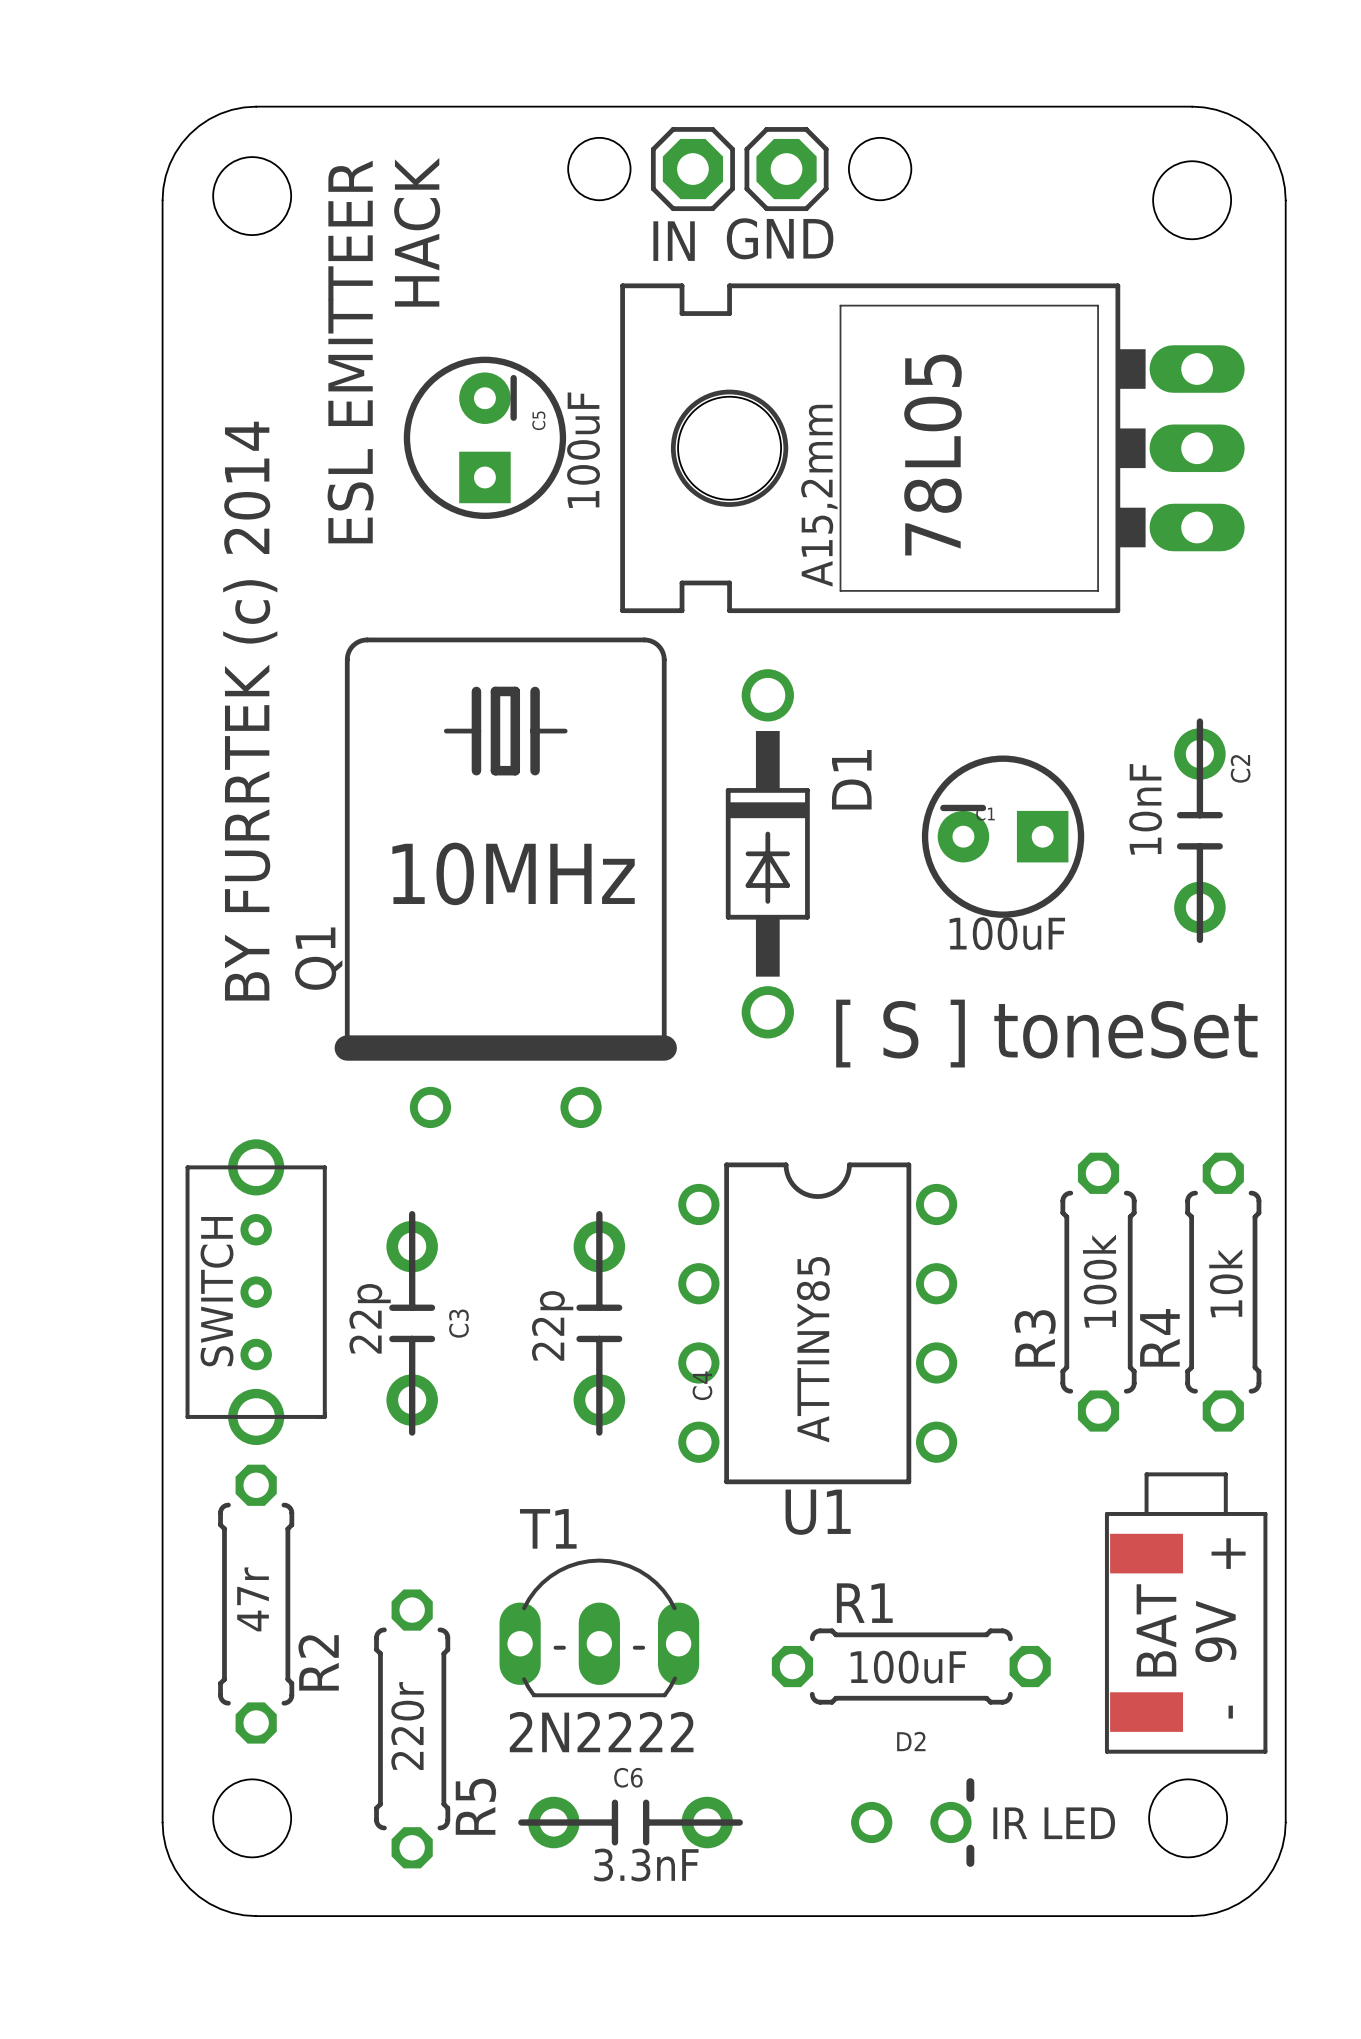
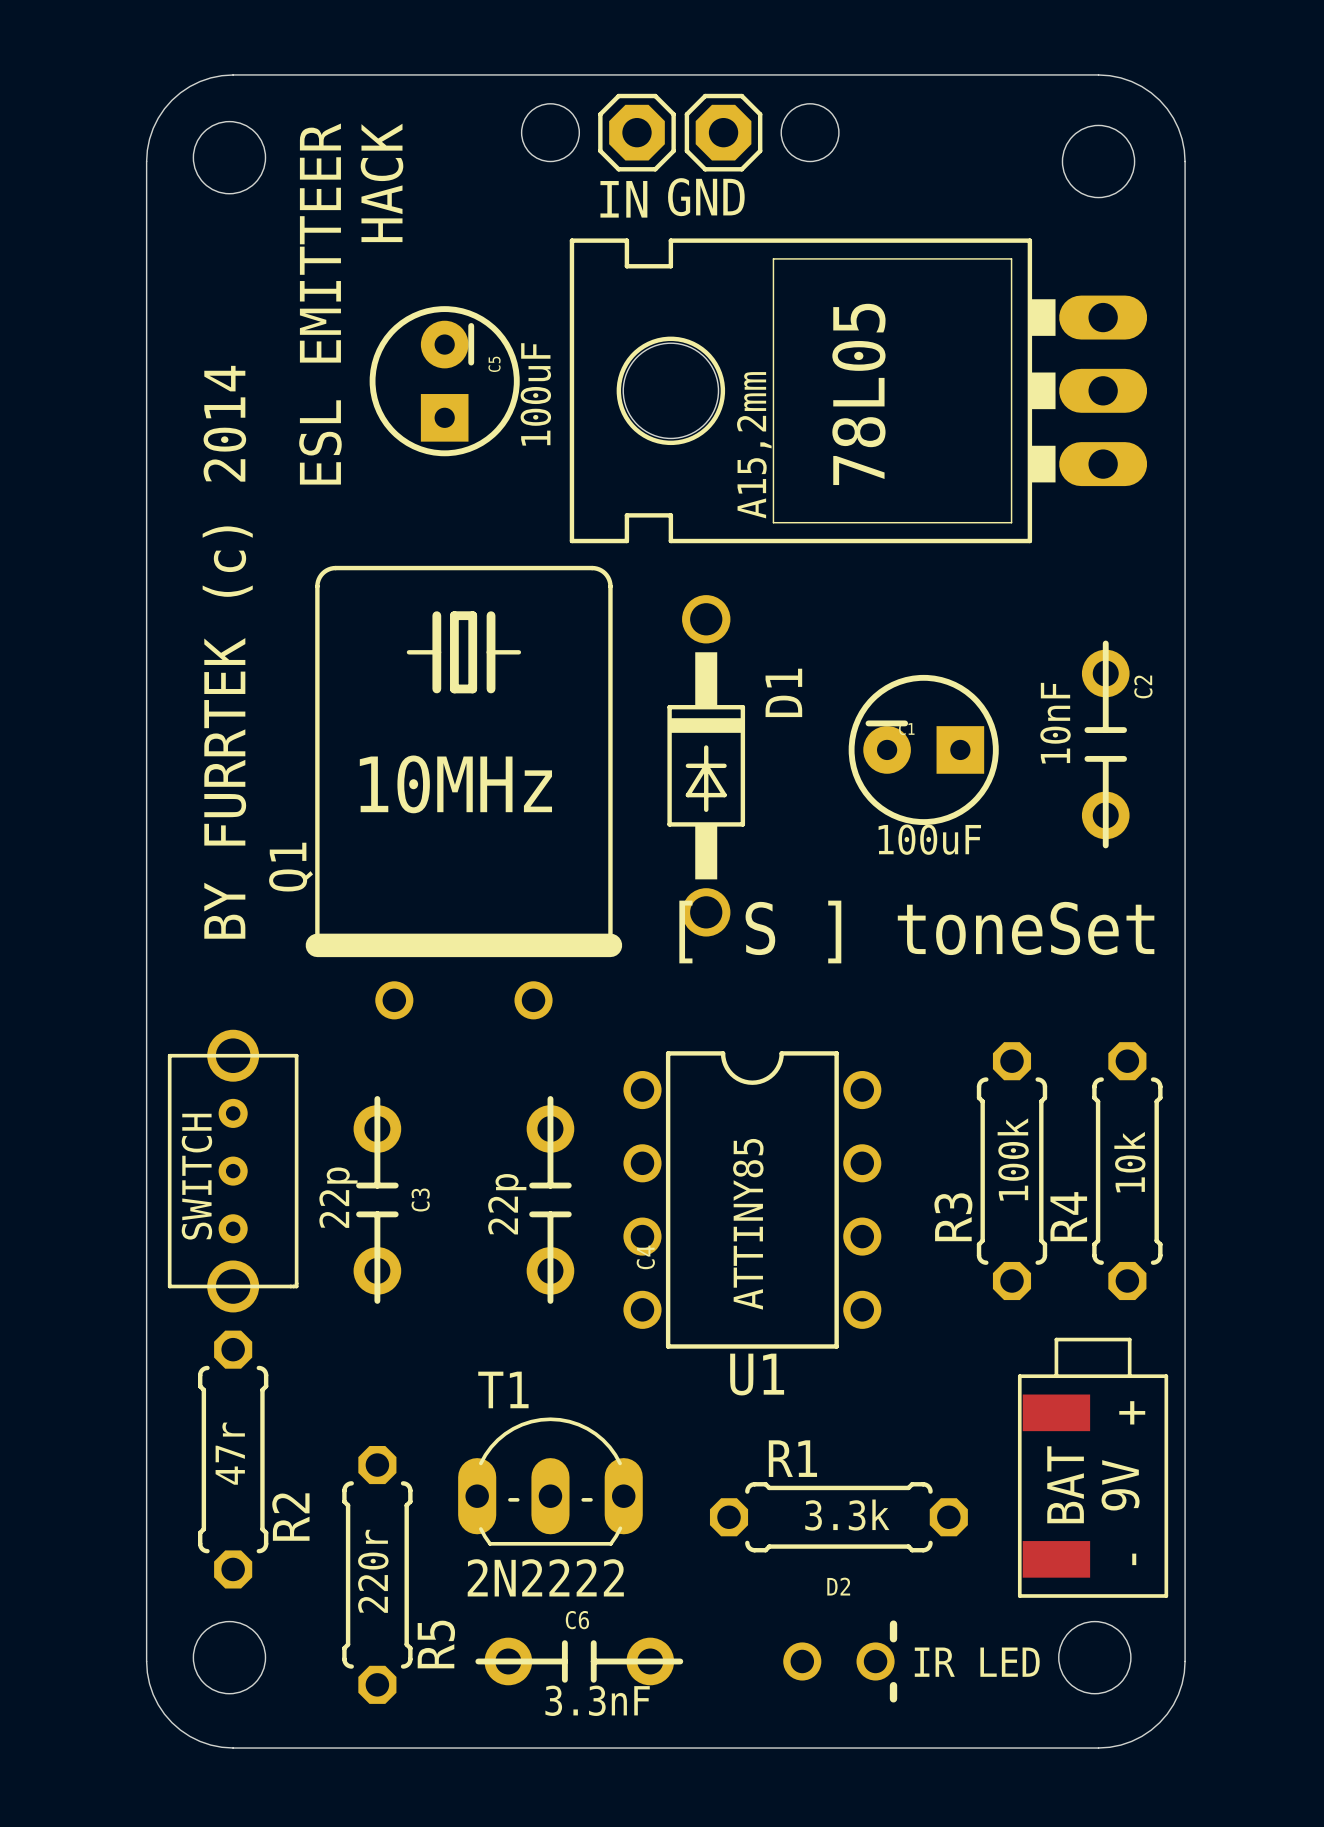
text: 100uF (908, 1667) -> 3.3k (847, 1515)

